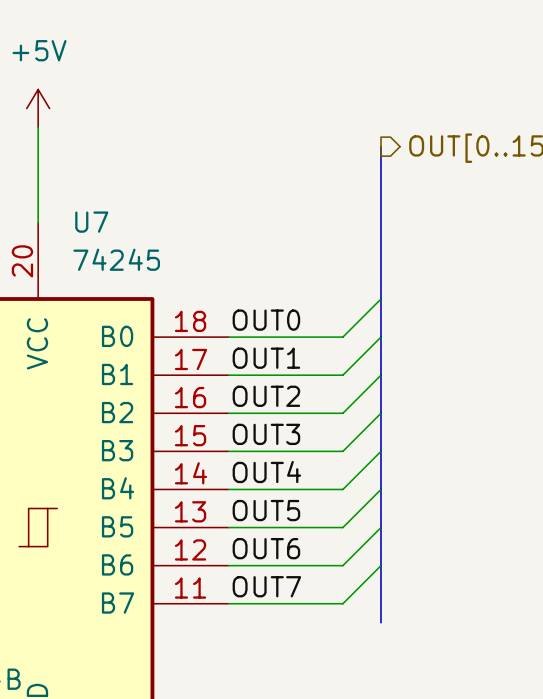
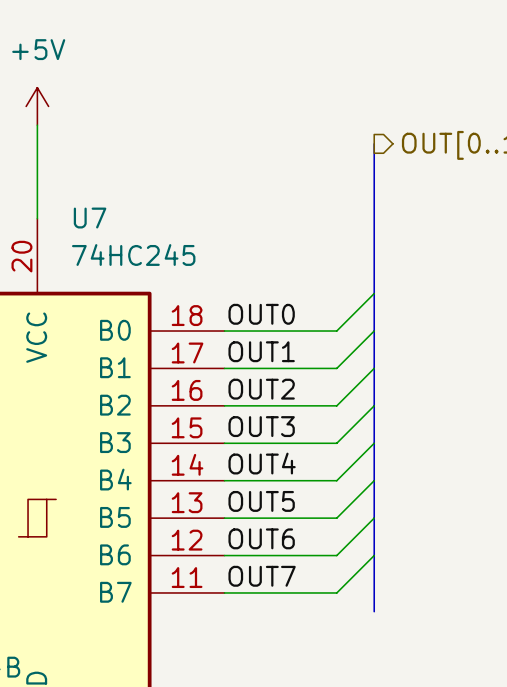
U7 value: 74245 (116, 259) -> 74HC245 (133, 255)

